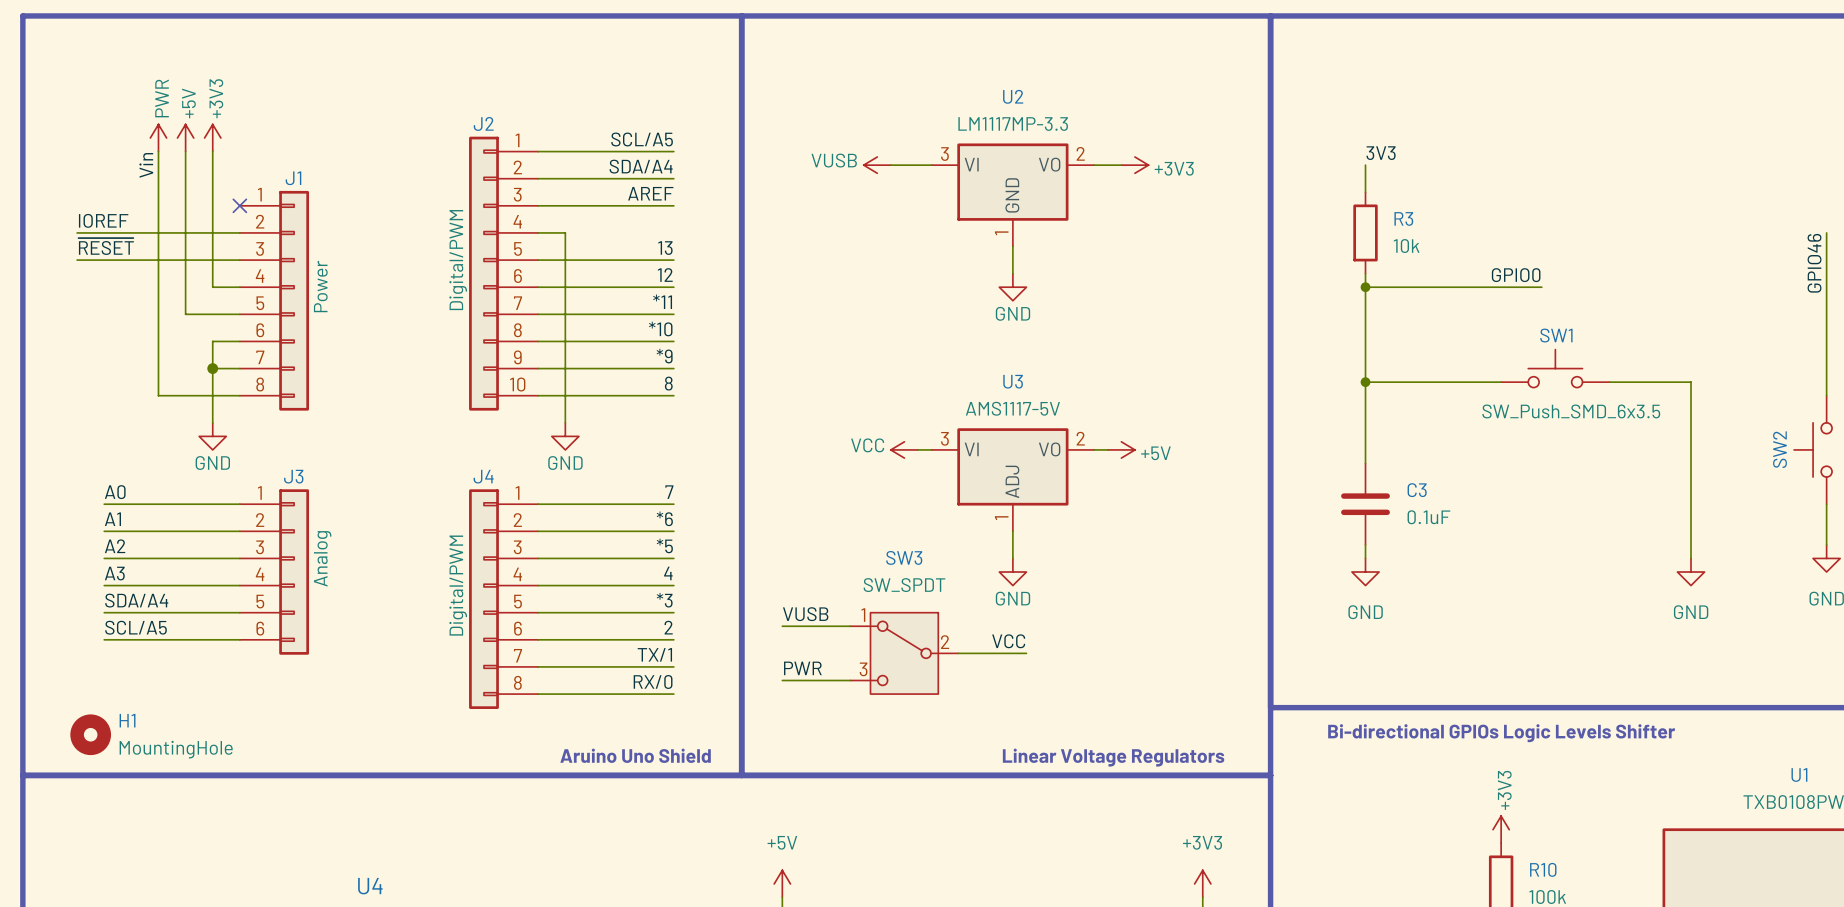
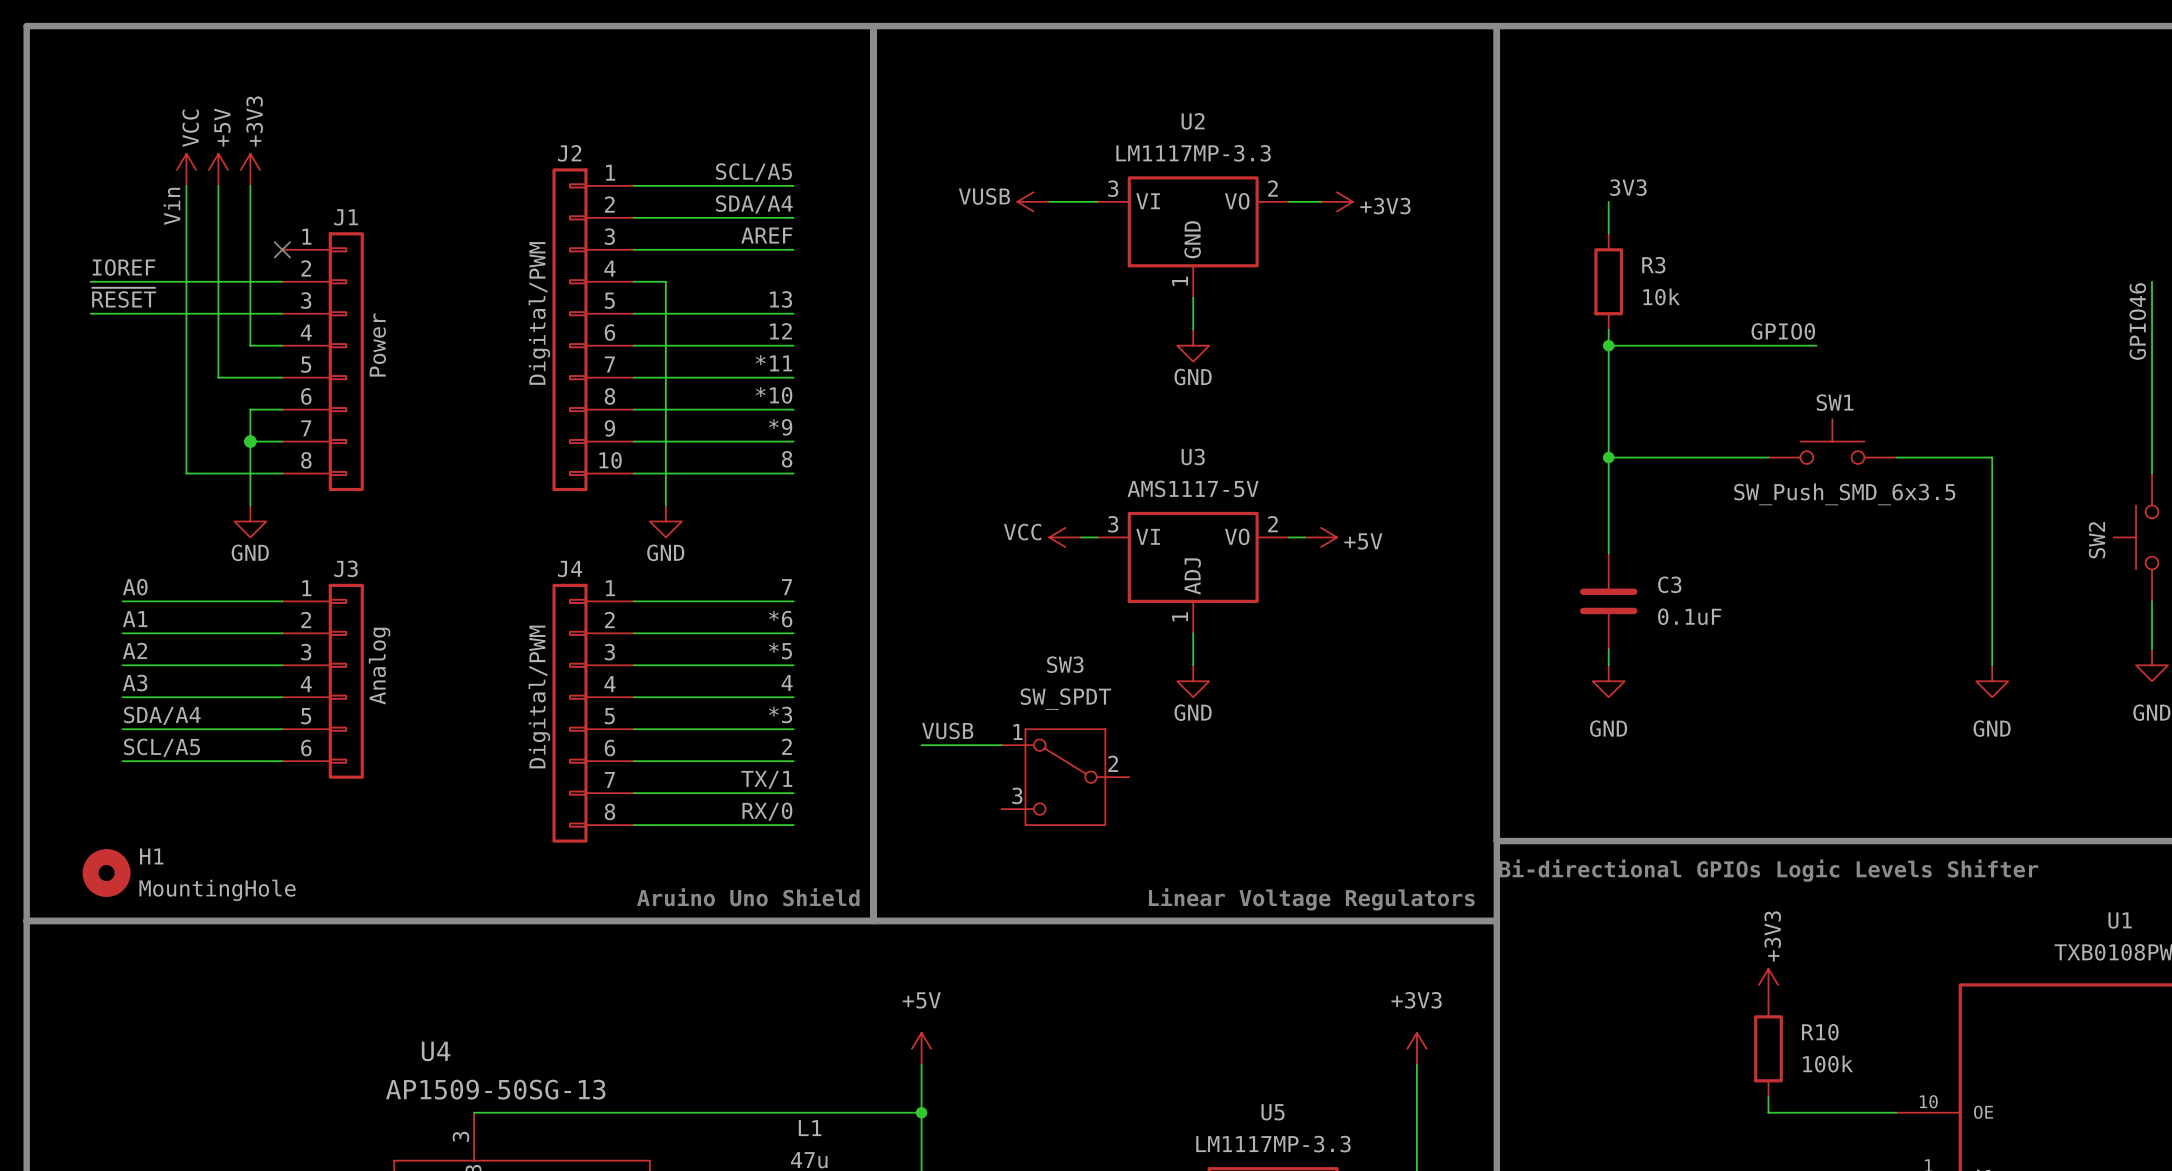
power symbol: PWR (158, 138) -> VCC (186, 169)
label: VCC (1008, 641) -> none
wire: (958, 653) (1026, 653) -> none
label: PWR (802, 668) -> none
wire: (782, 680) (850, 680) -> none

